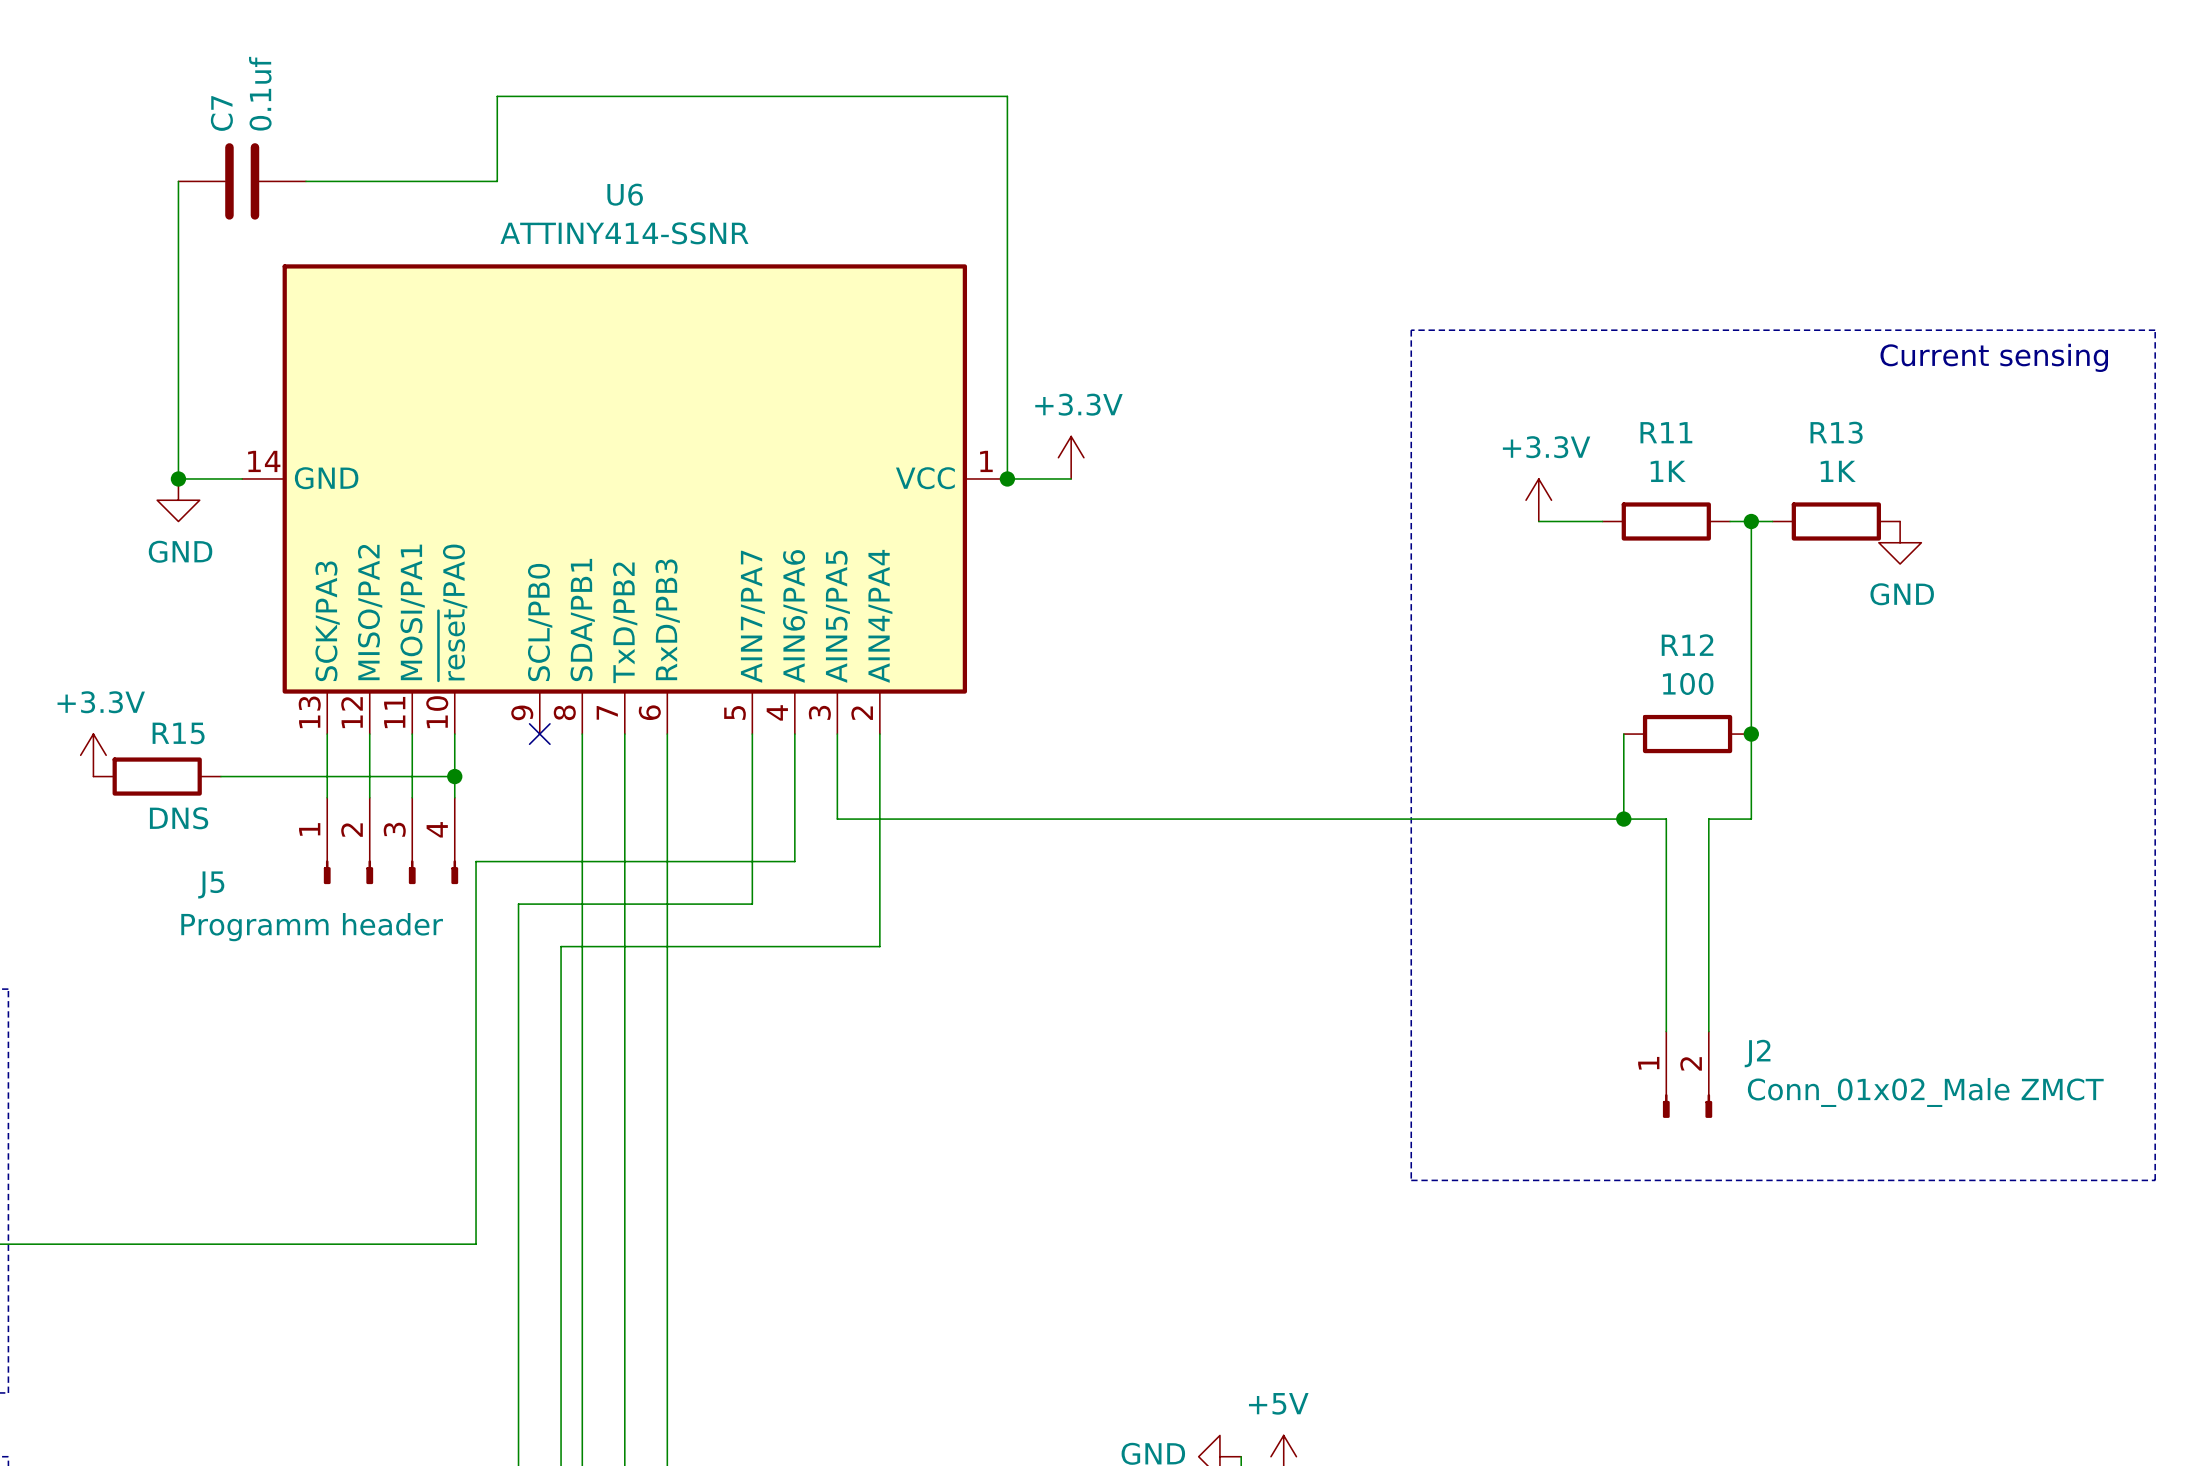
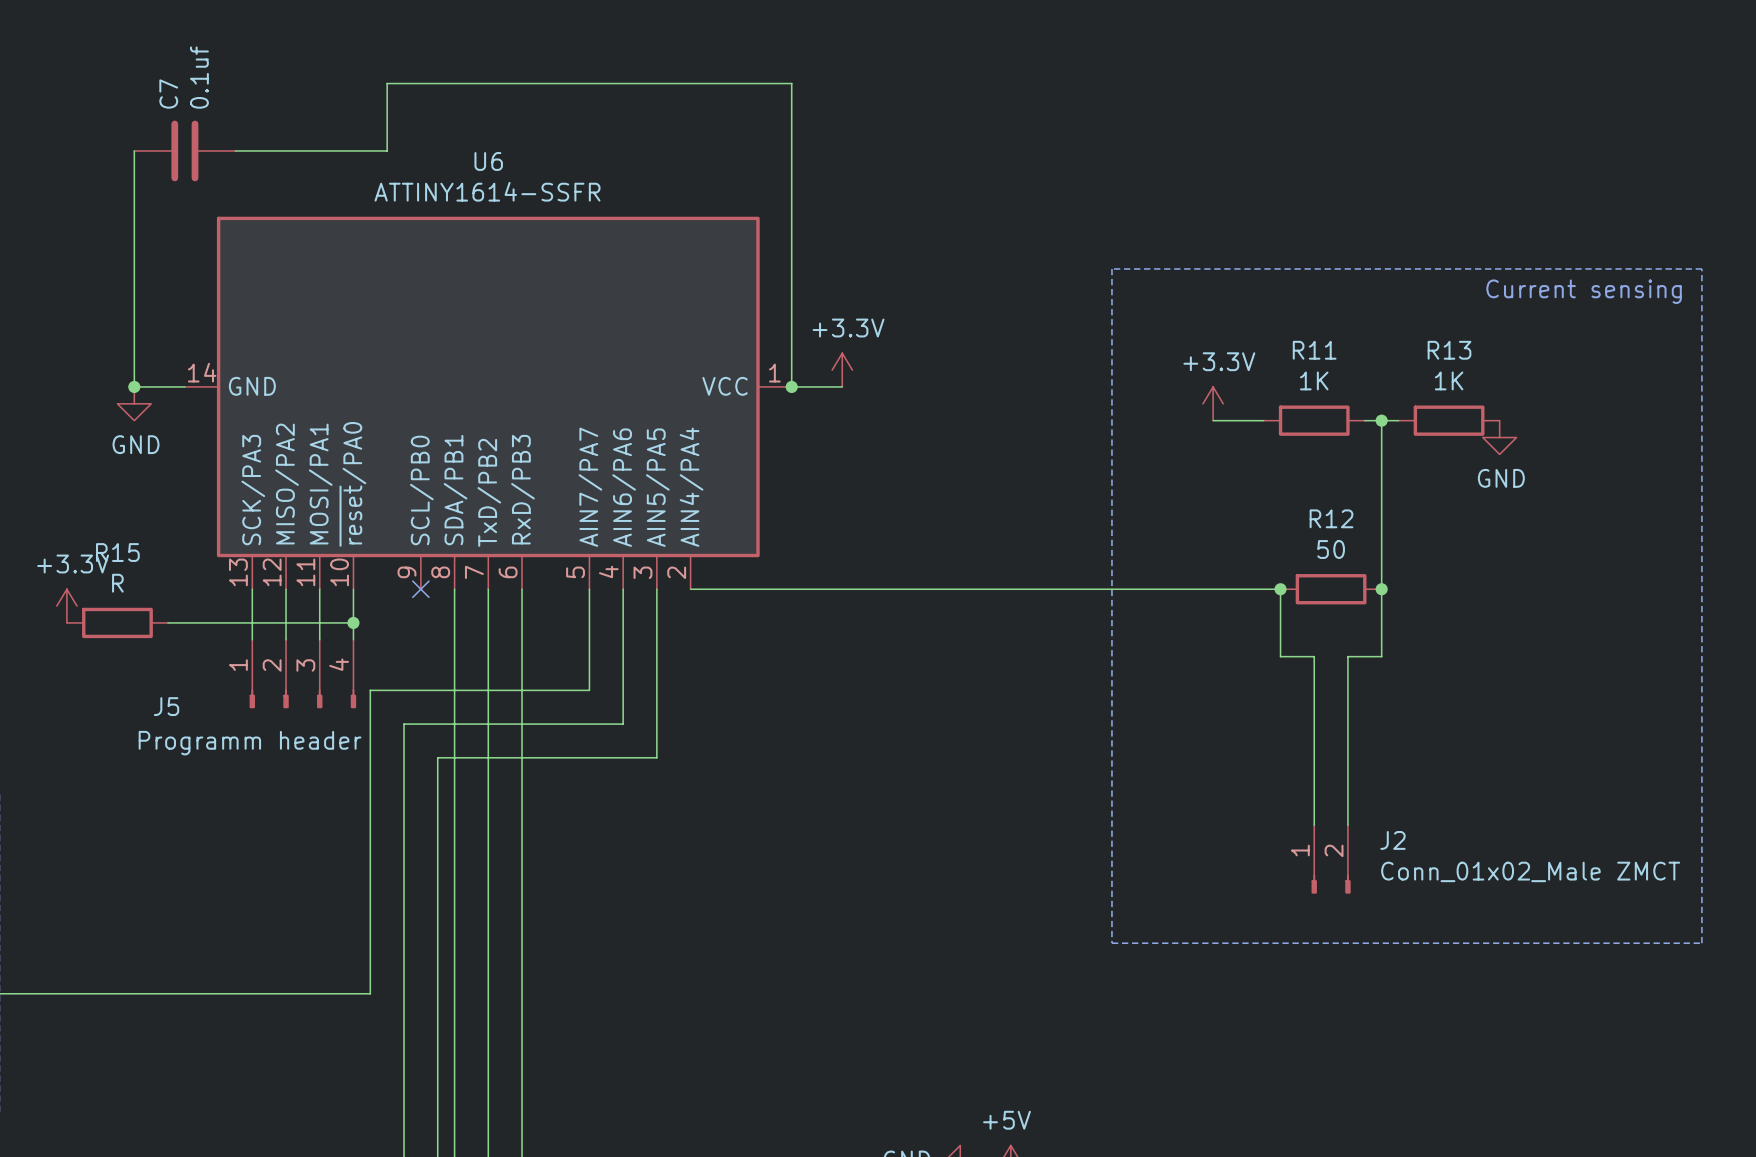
U6 value: ATTINY414-SSNR (624, 233) -> ATTINY1614-SSFR (487, 191)
R12 value: 100 (1688, 683) -> 50 (1331, 549)
R15 name position: R15 (178, 733) -> R15 (117, 552)
wire: (879, 734) (879, 946) (837, 946) -> (656, 656) (656, 757)
wire: none -> (690, 589) (1280, 589)
R15 value: DNS (179, 818) -> R (117, 583)
wire: (837, 819) (1623, 819) -> none
junction position: (1623, 819) -> (1280, 589)
wire: (794, 861) (752, 861) (752, 904) -> (623, 690) (623, 724) (589, 724)

